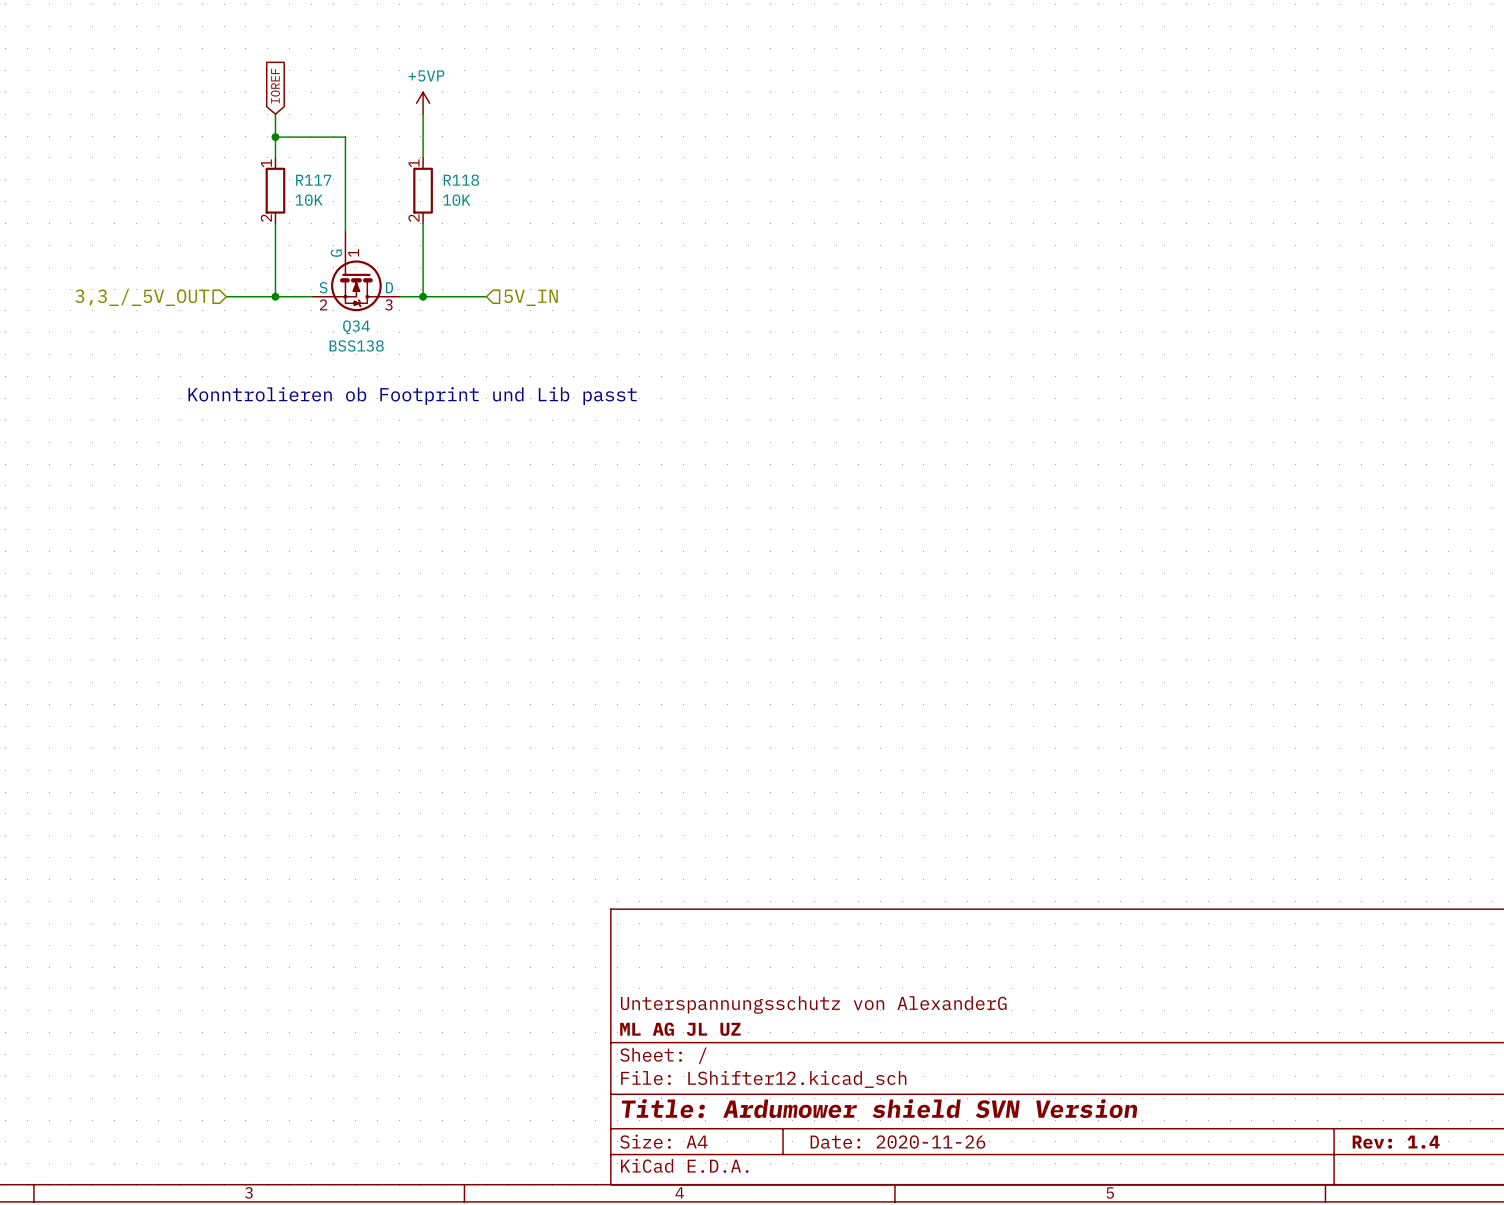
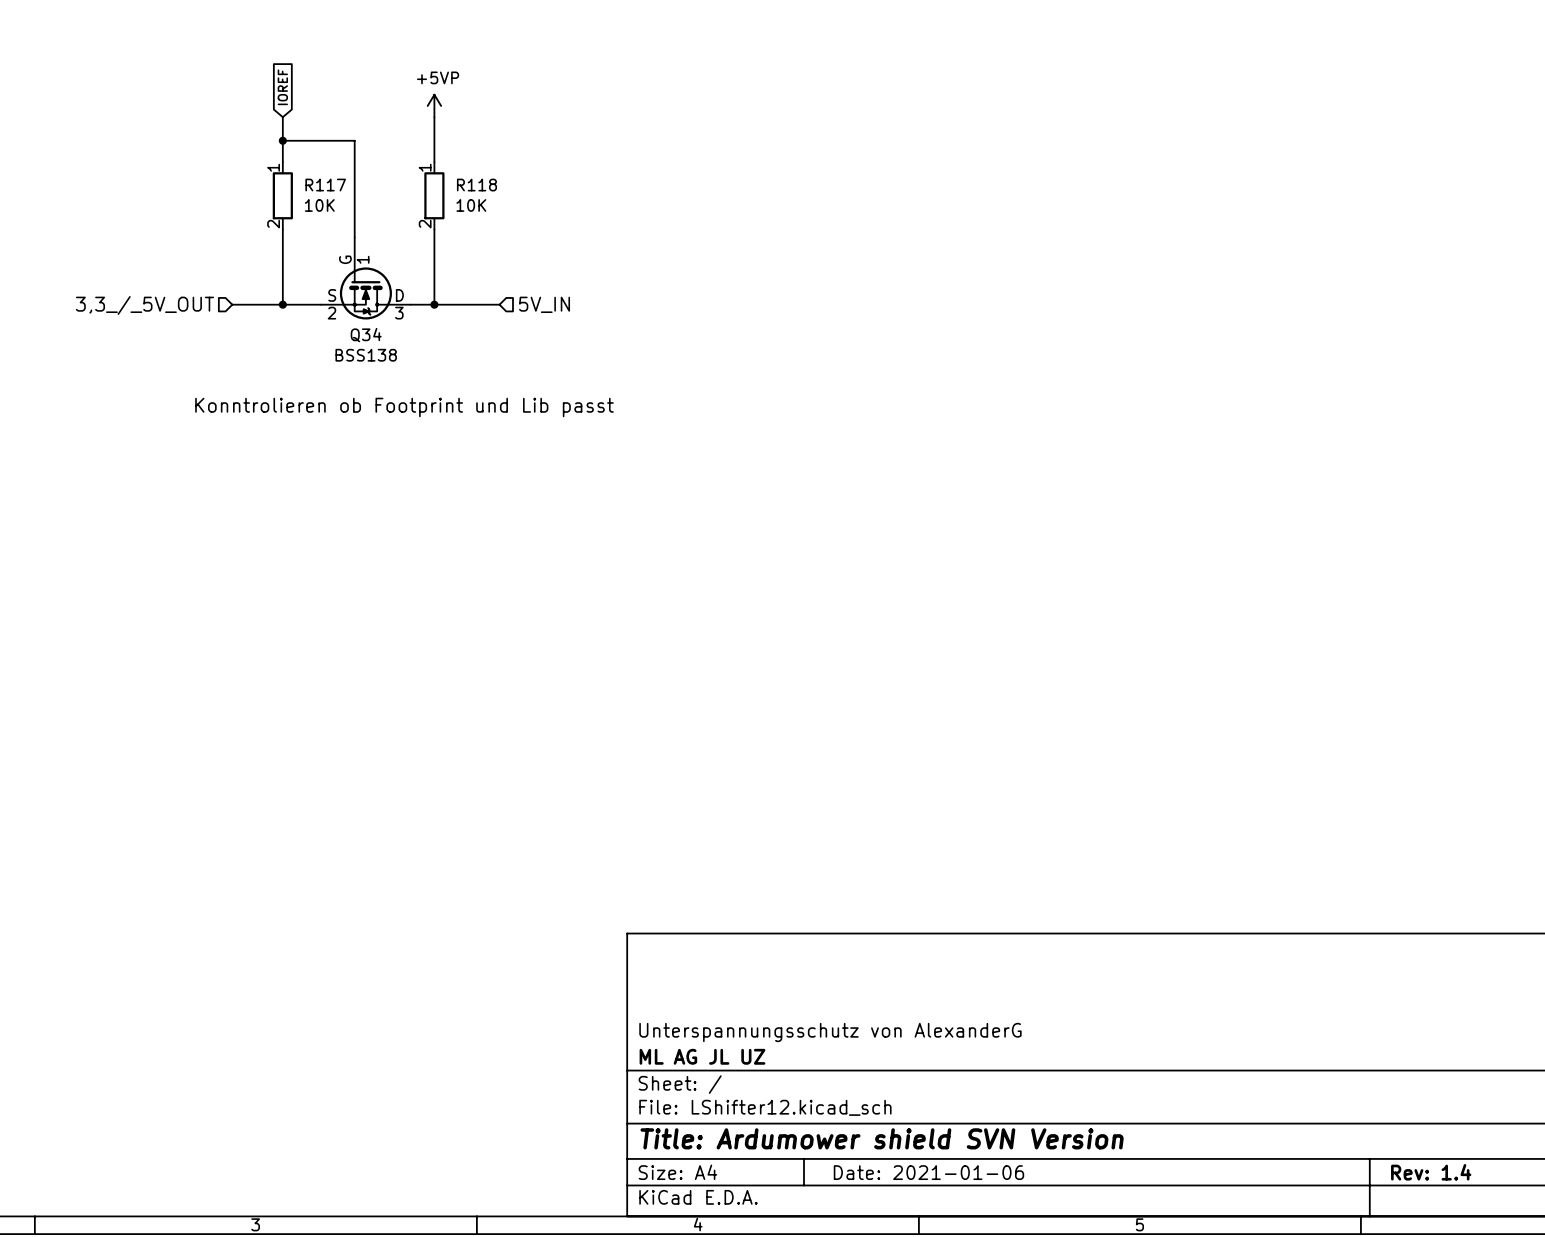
title block: Date: 2020-11-26 (897, 1142) -> Date: 2021-01-06 (928, 1172)

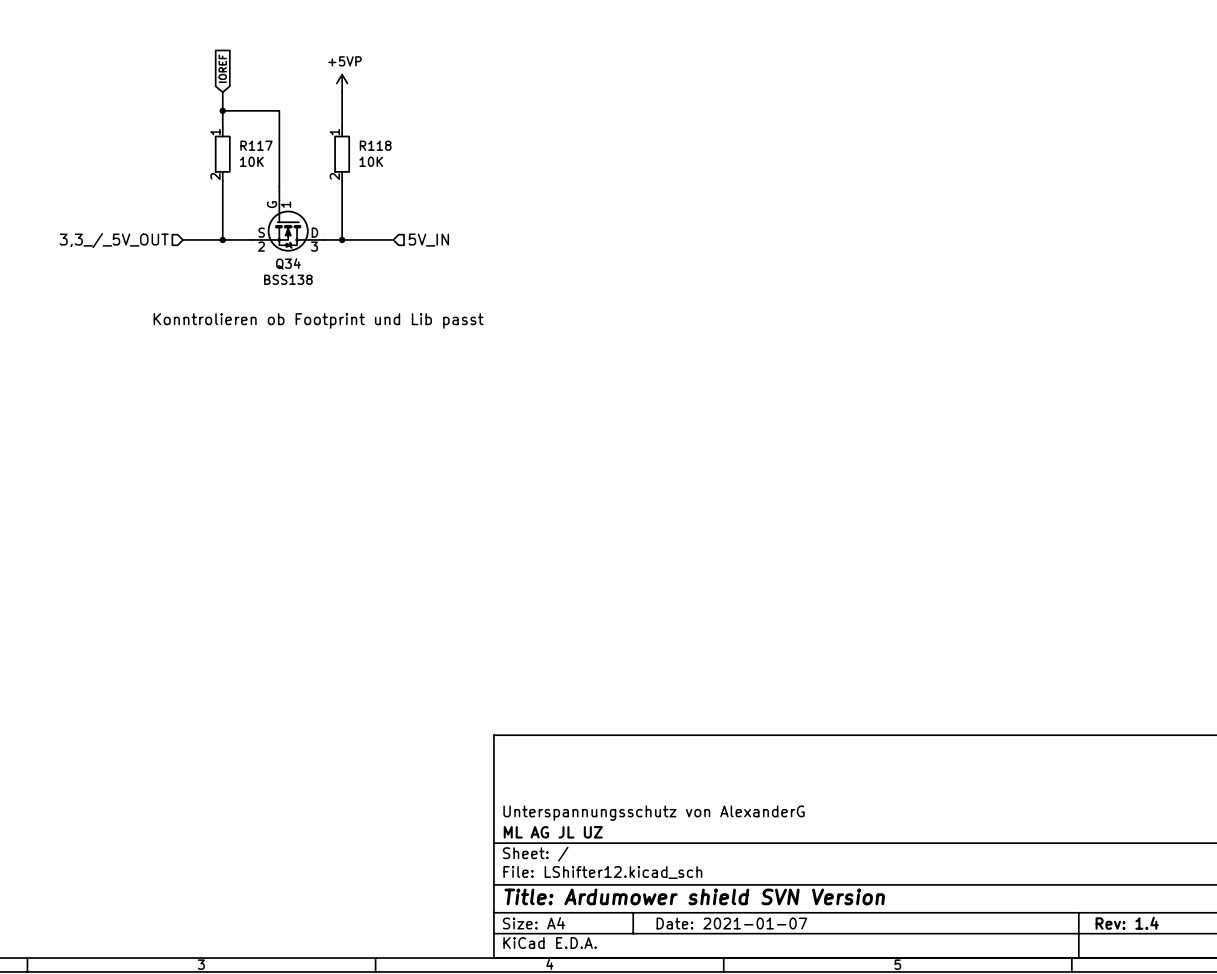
title block: Date: 2021-01-06 (928, 1172) -> Date: 2021-01-07 (731, 923)

